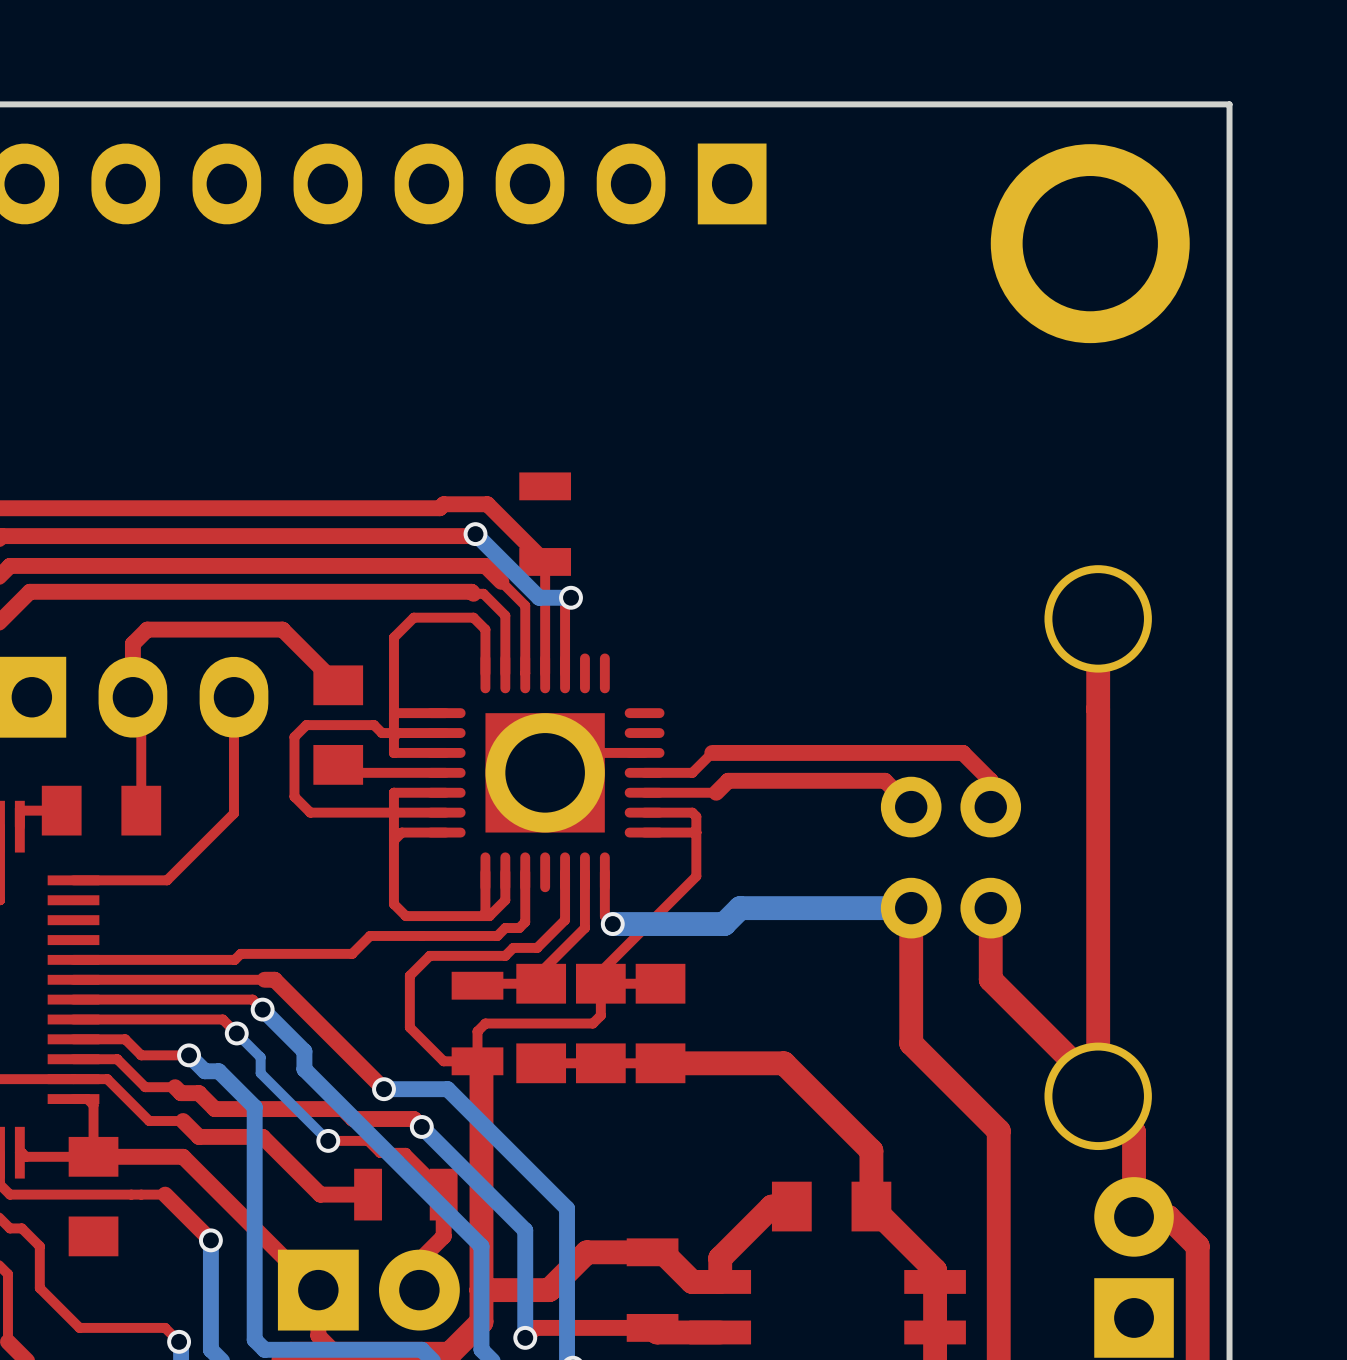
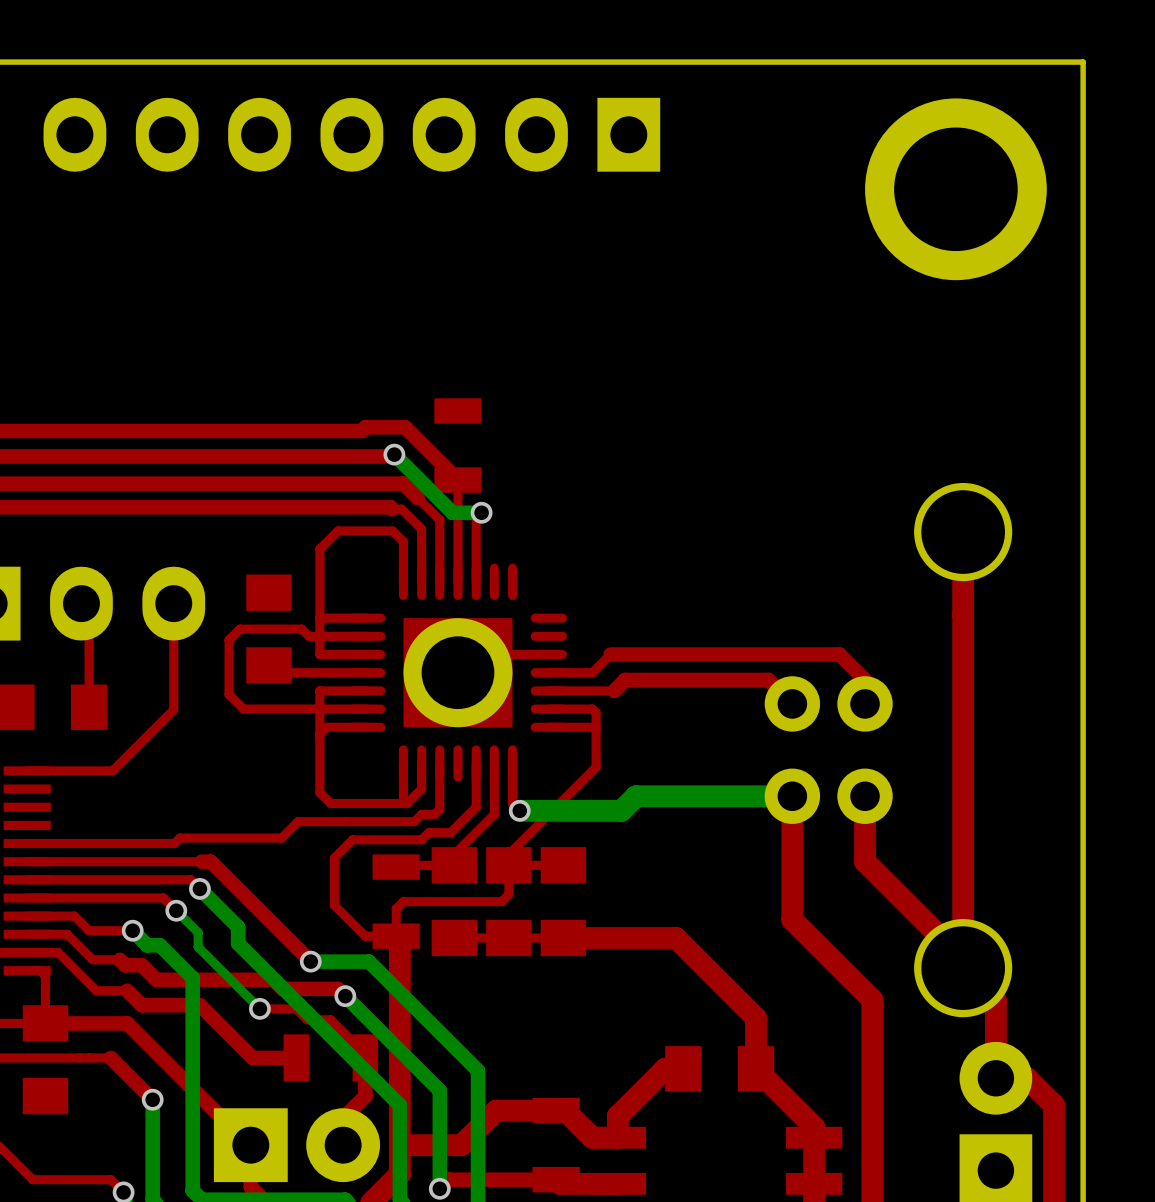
top track: (338, 685) (282, 629) (147, 629) (132, 643) (132, 697) -> none

